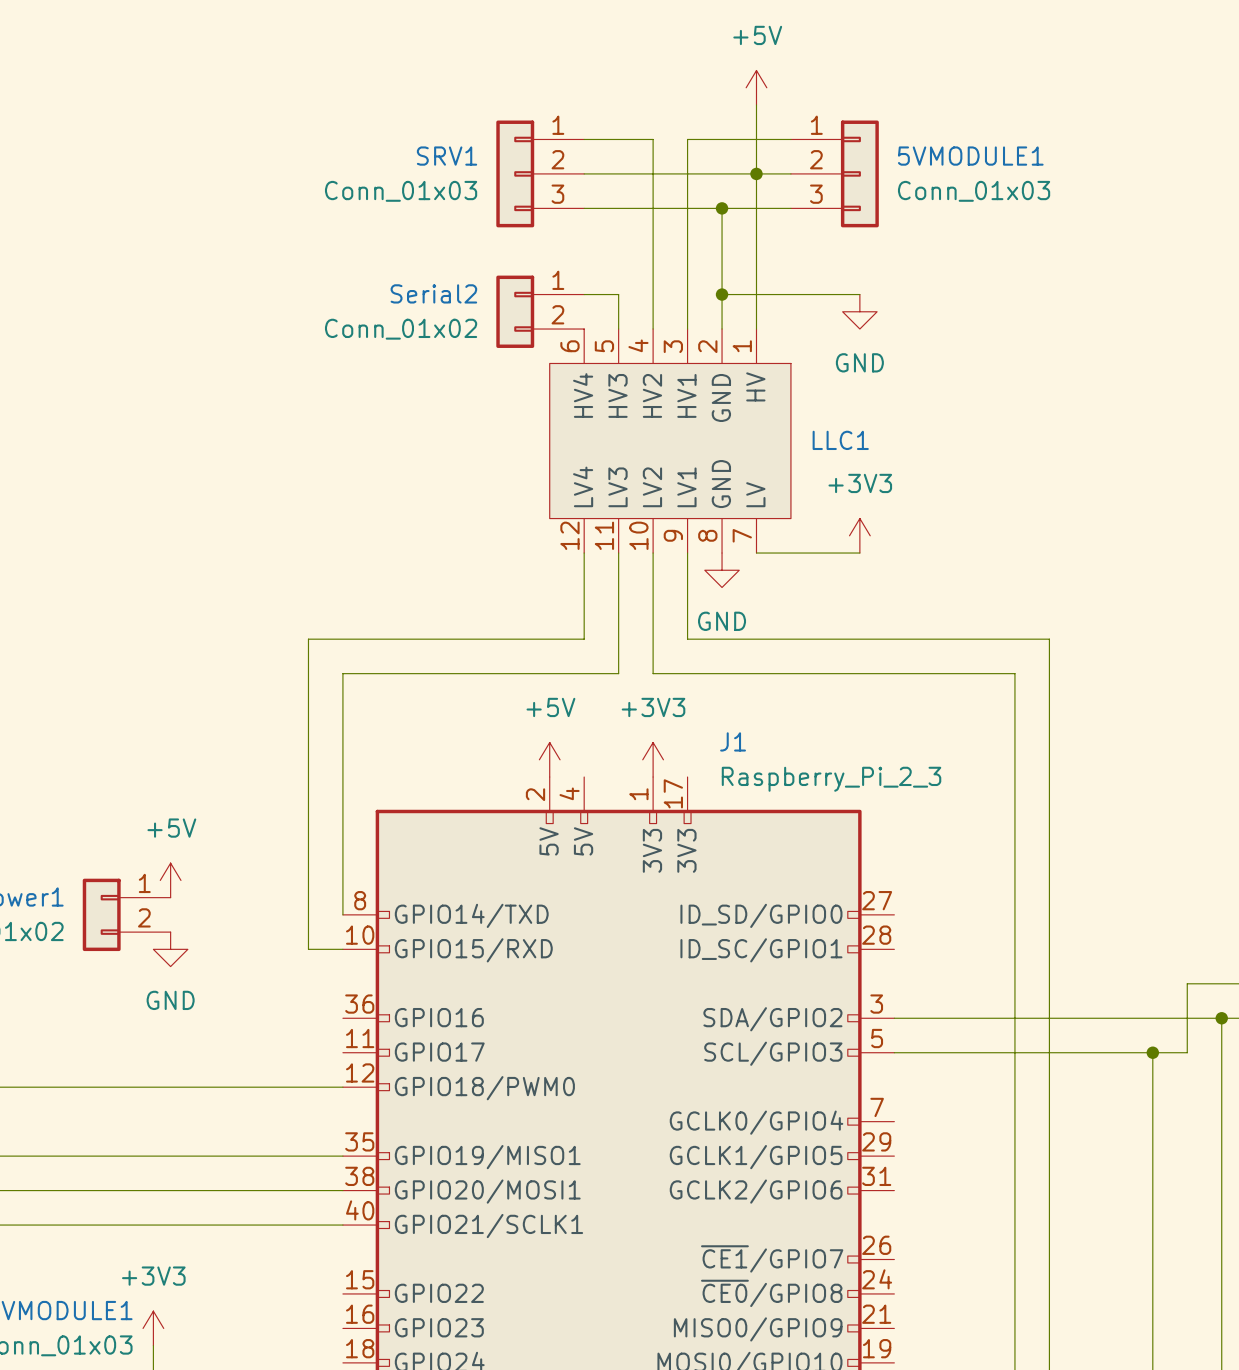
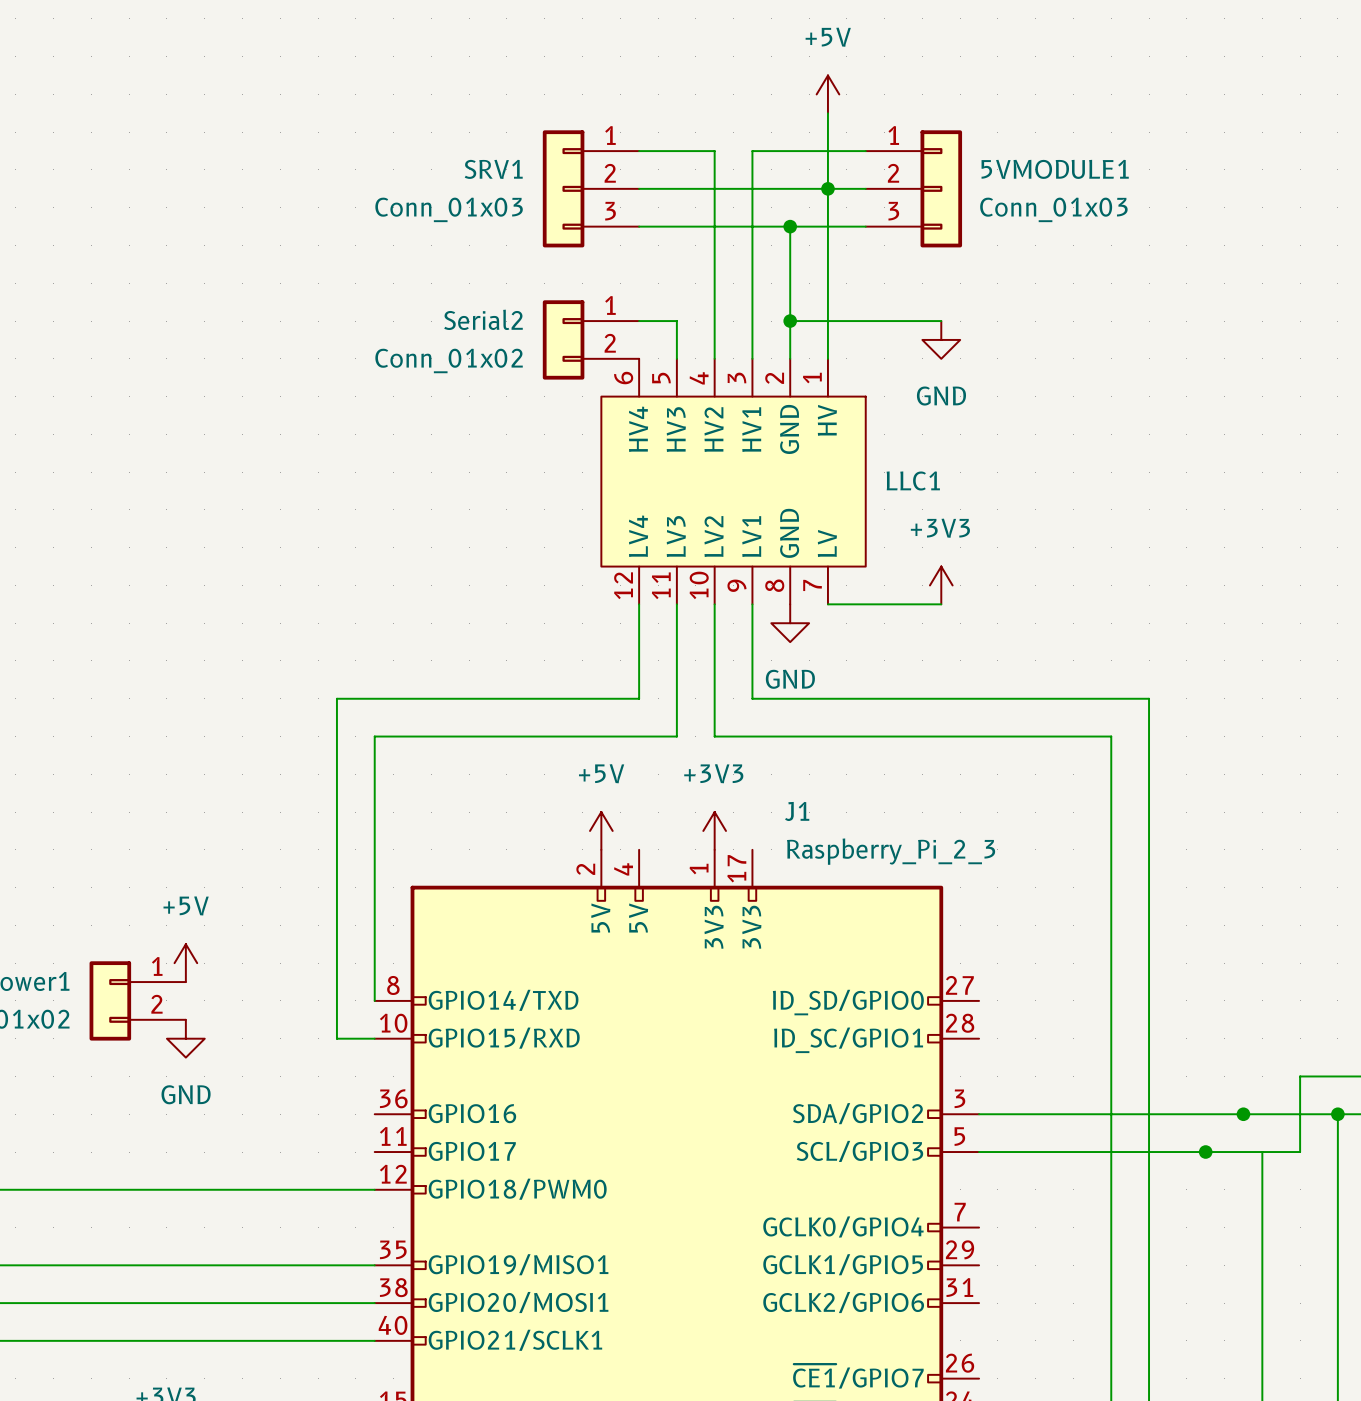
junction: none -> (1243, 1114)
junction: none -> (1205, 1152)
junction: (1152, 1052) -> none

